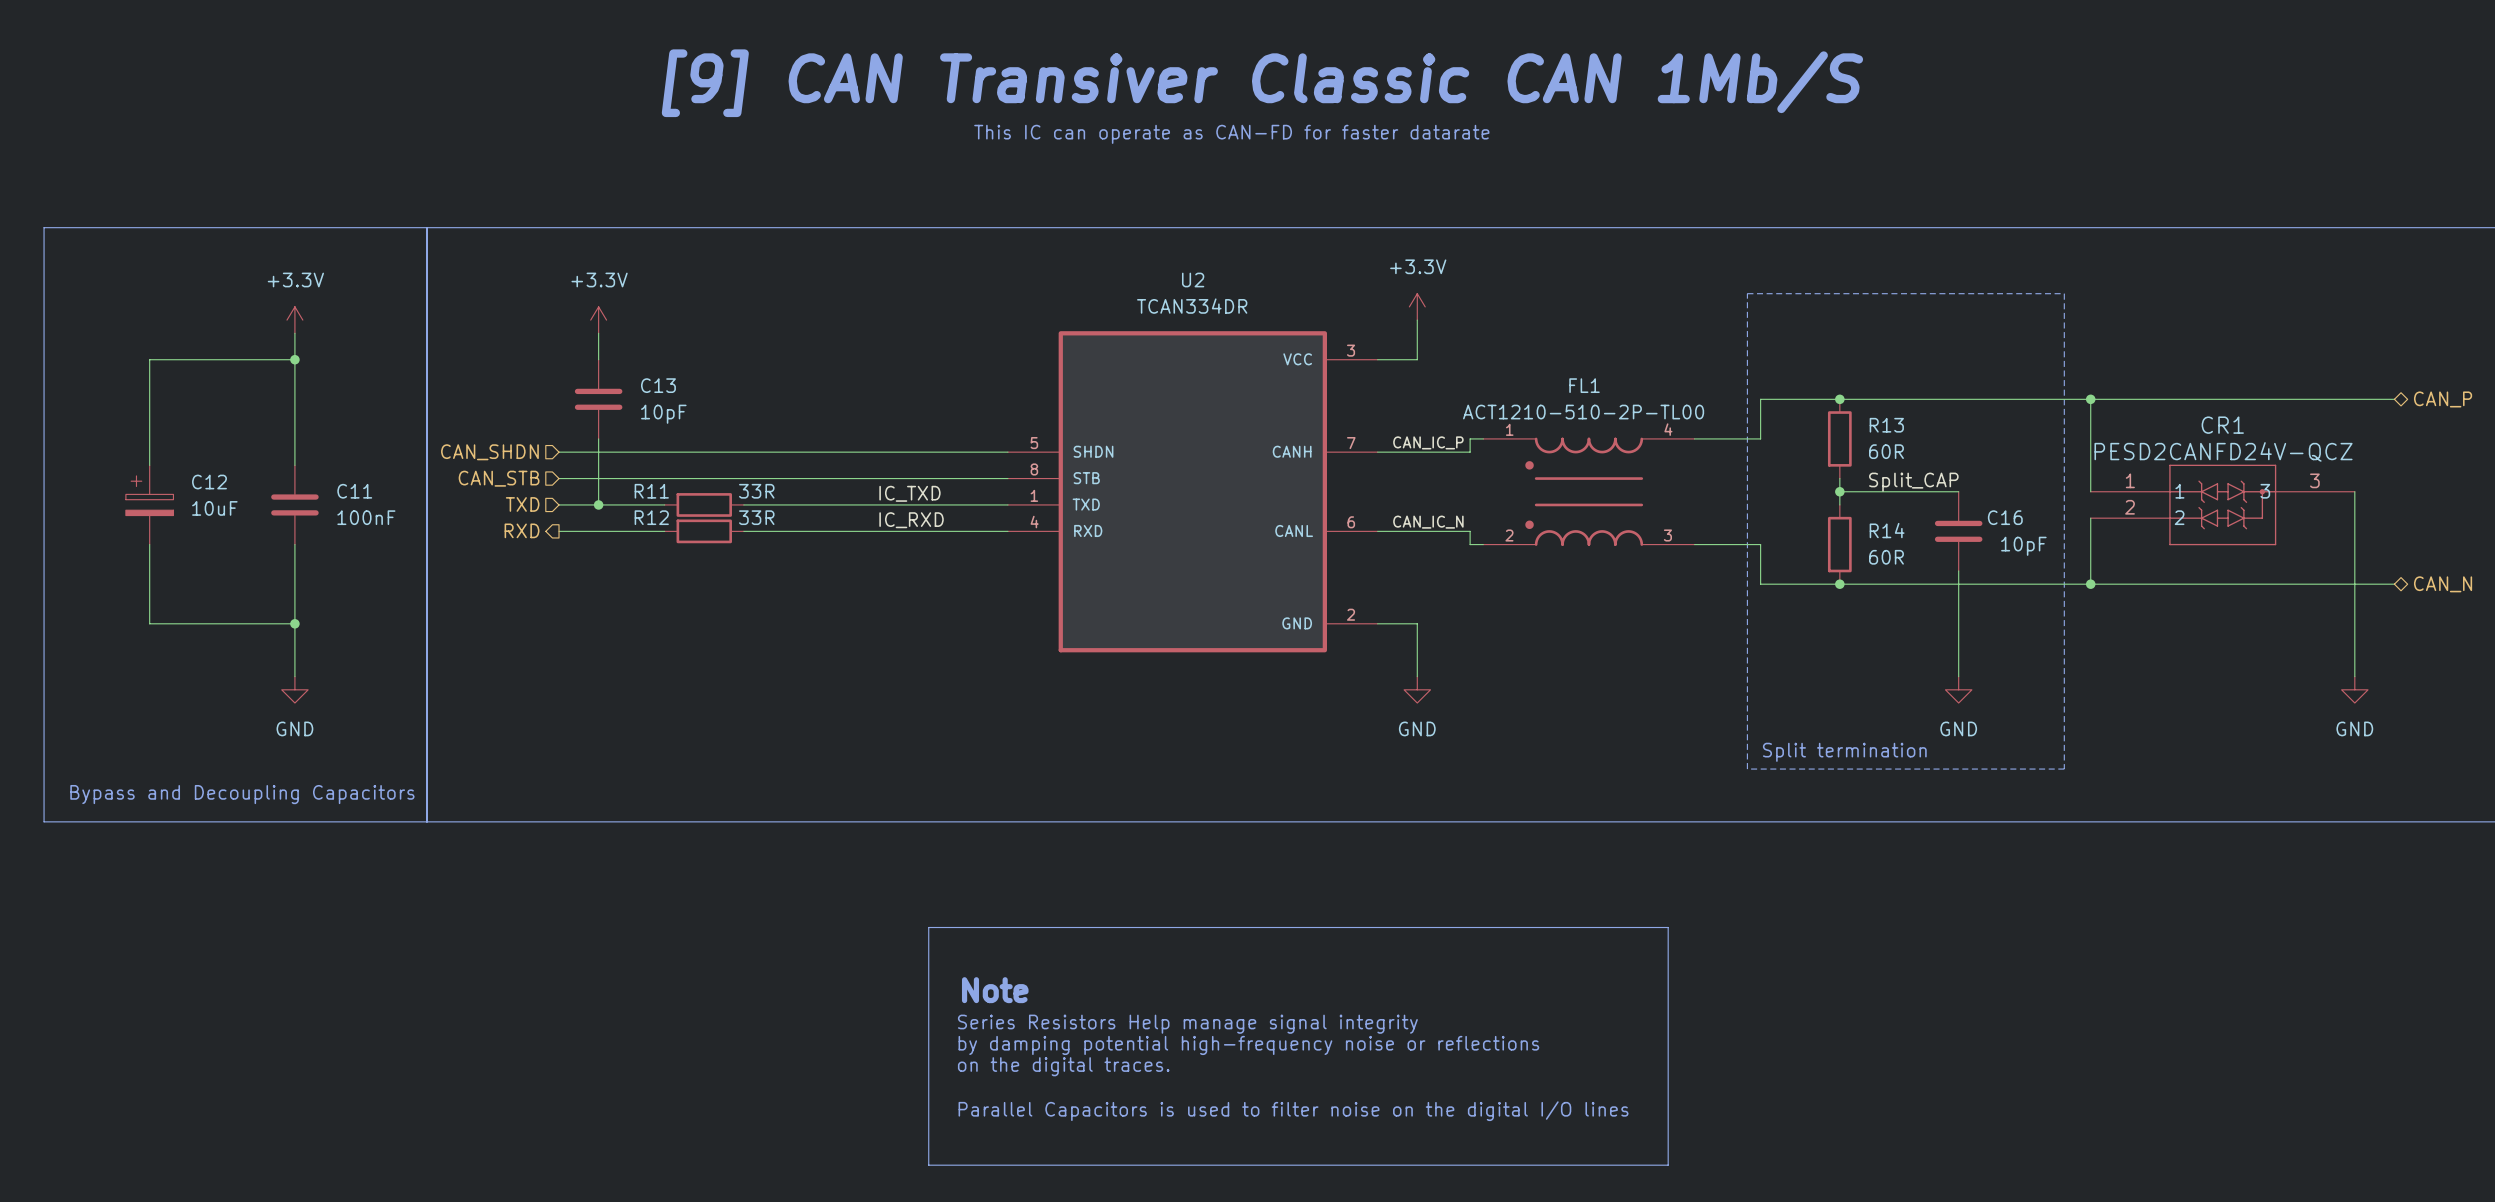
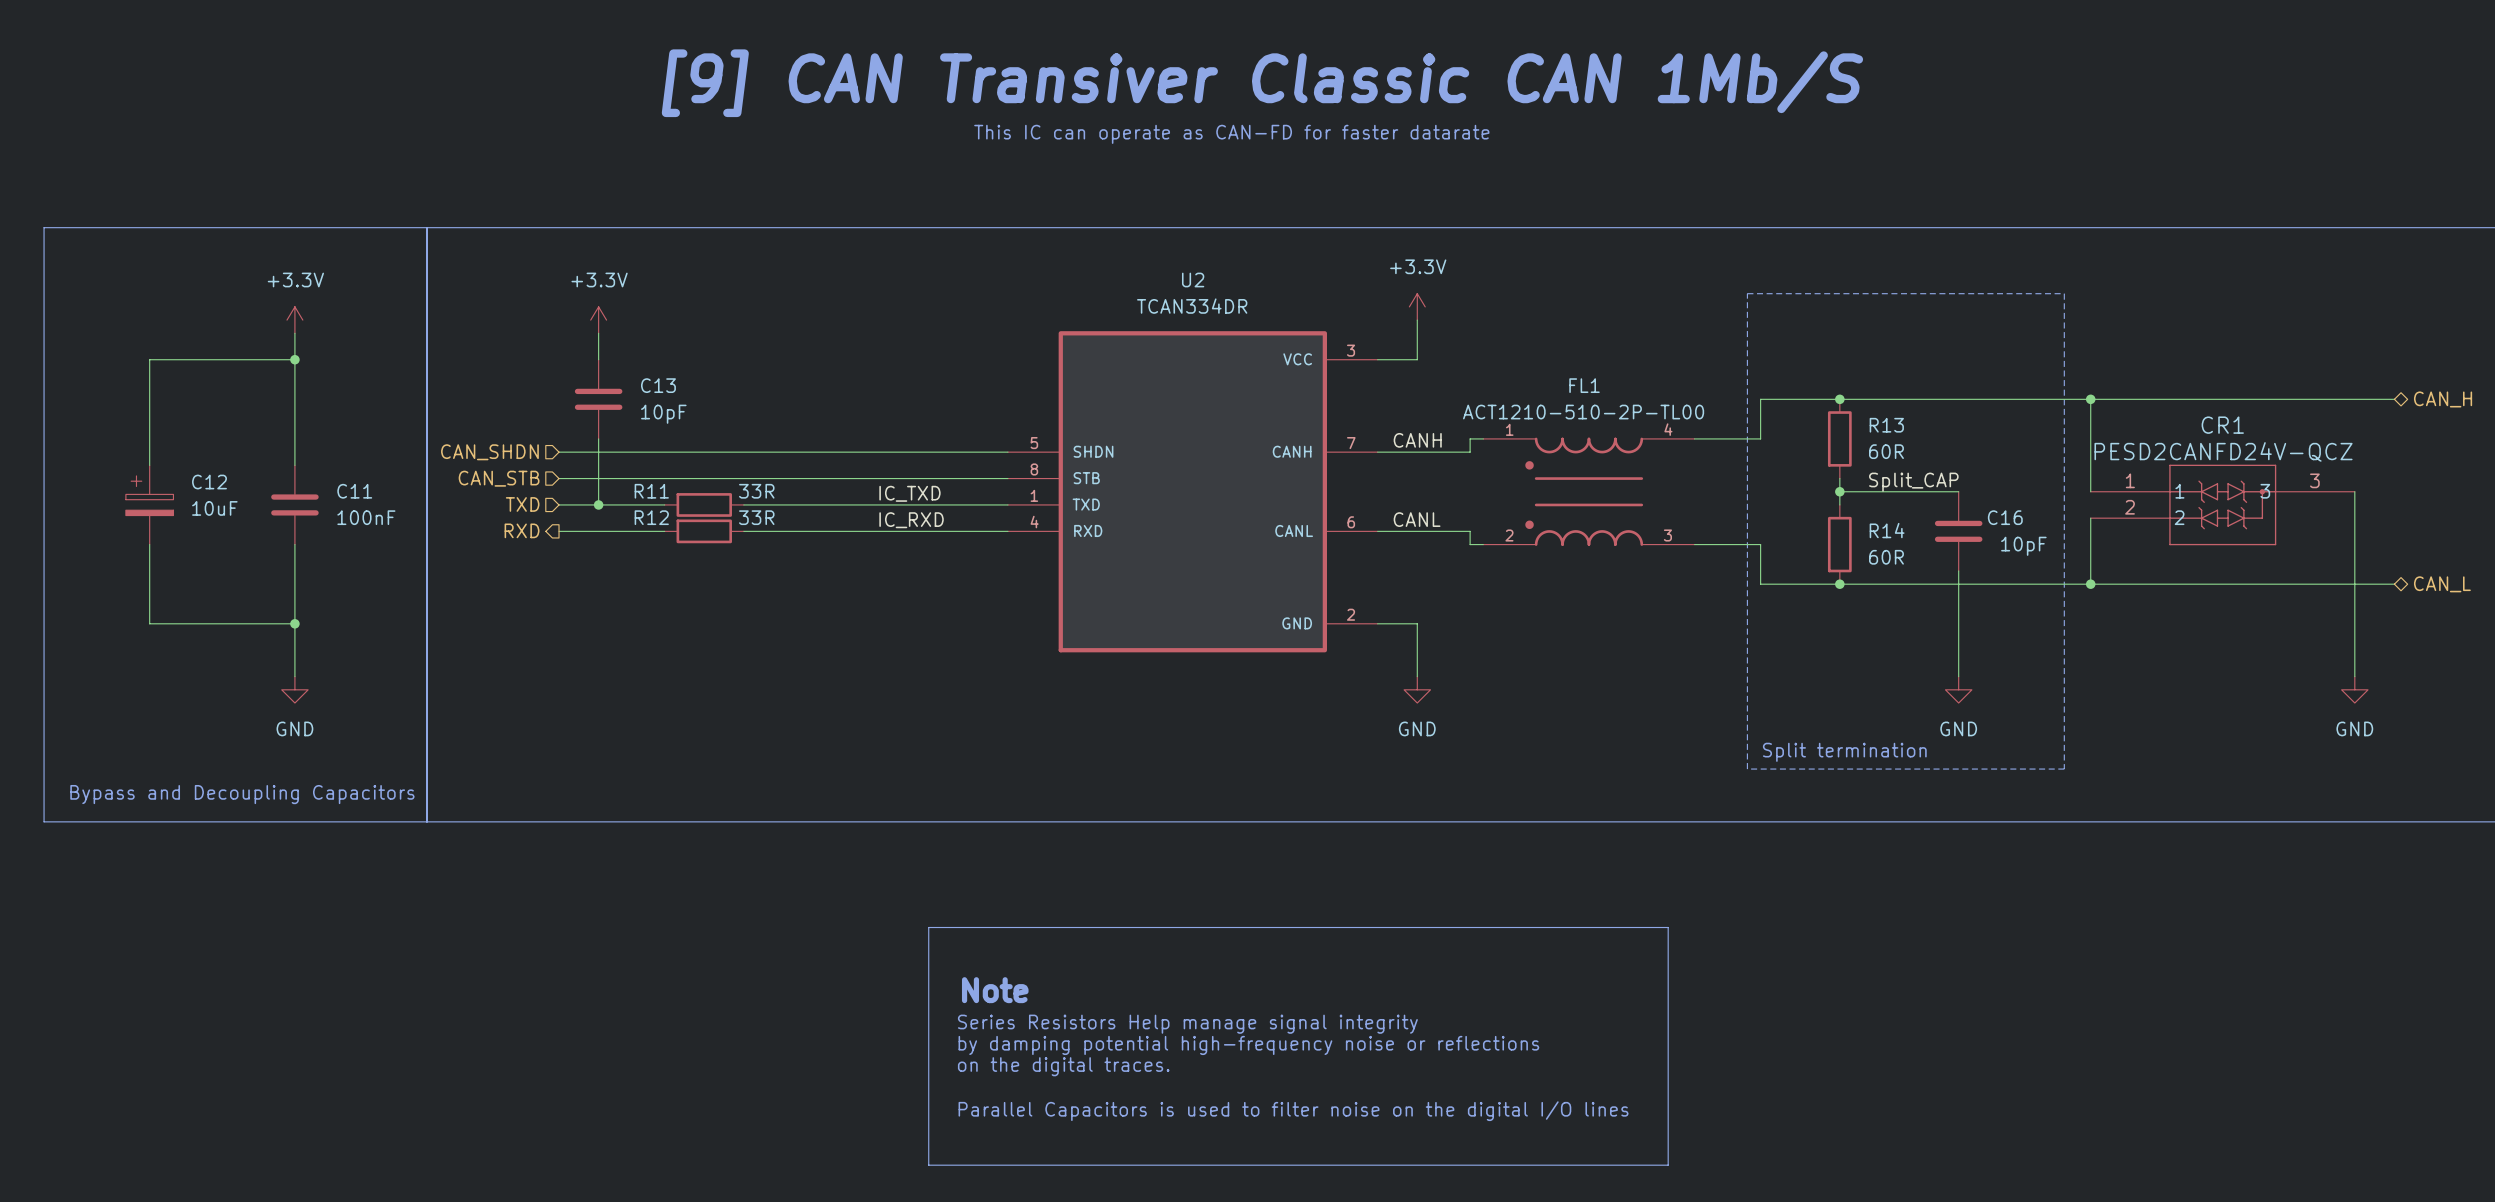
hierarchical label: CAN_P (2443, 399) -> CAN_H (2443, 399)
label: CAN_IC_P (1428, 442) -> CANH (1417, 440)
label: CAN_IC_N (1428, 522) -> CANL (1417, 519)
hierarchical label: CAN_N (2443, 584) -> CAN_L (2442, 584)

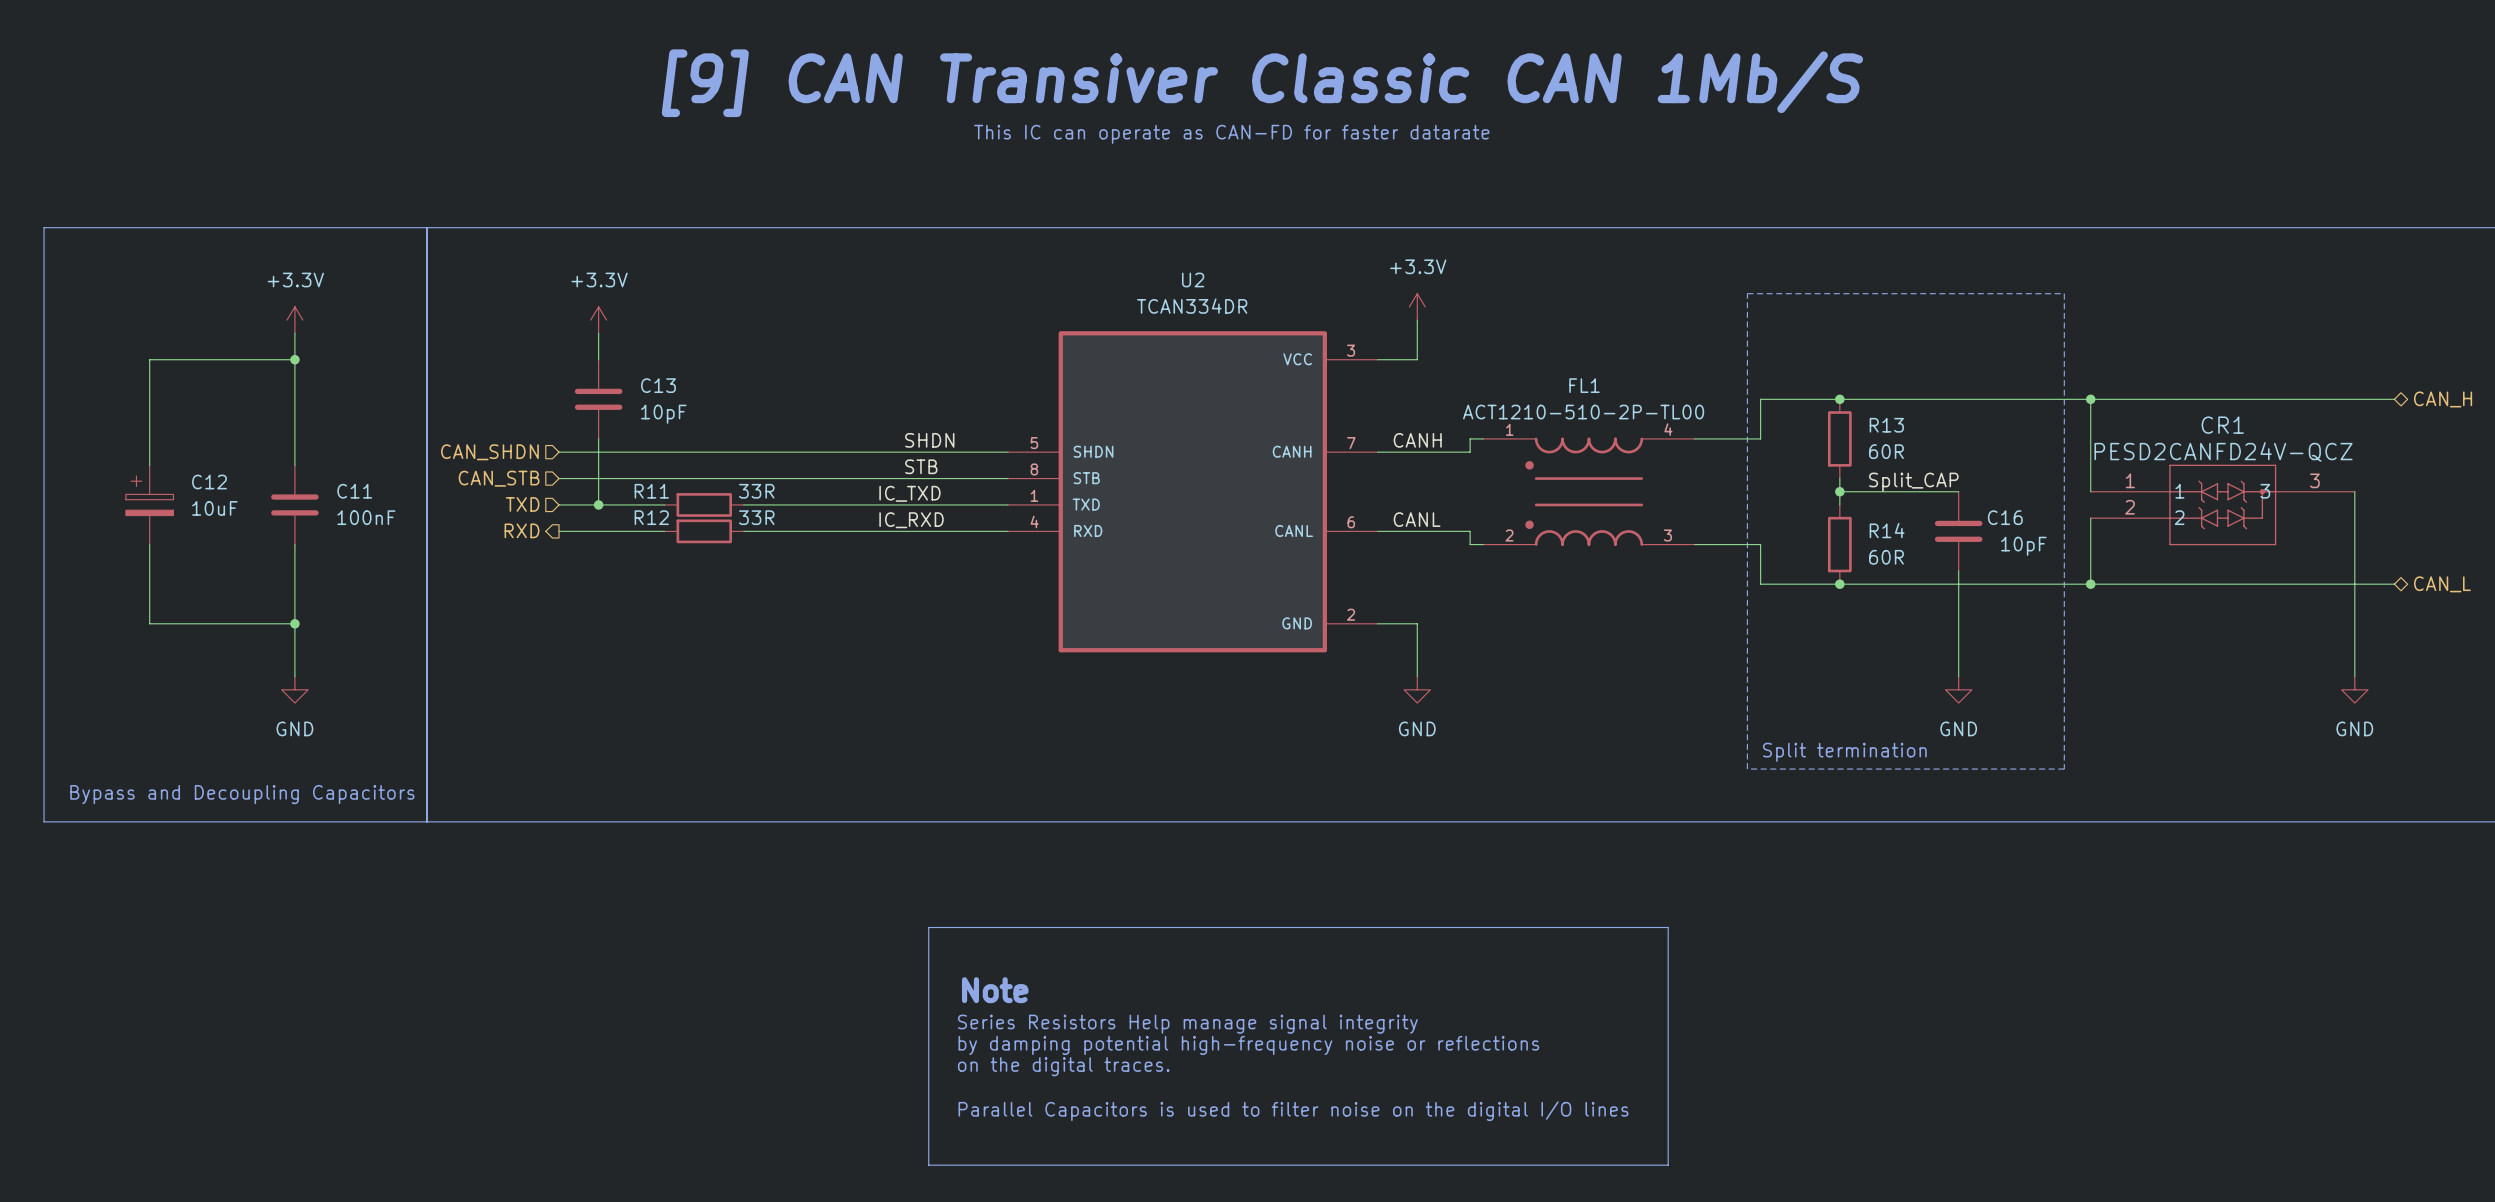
label: none -> SHDN (929, 440)
label: none -> STB (921, 466)

